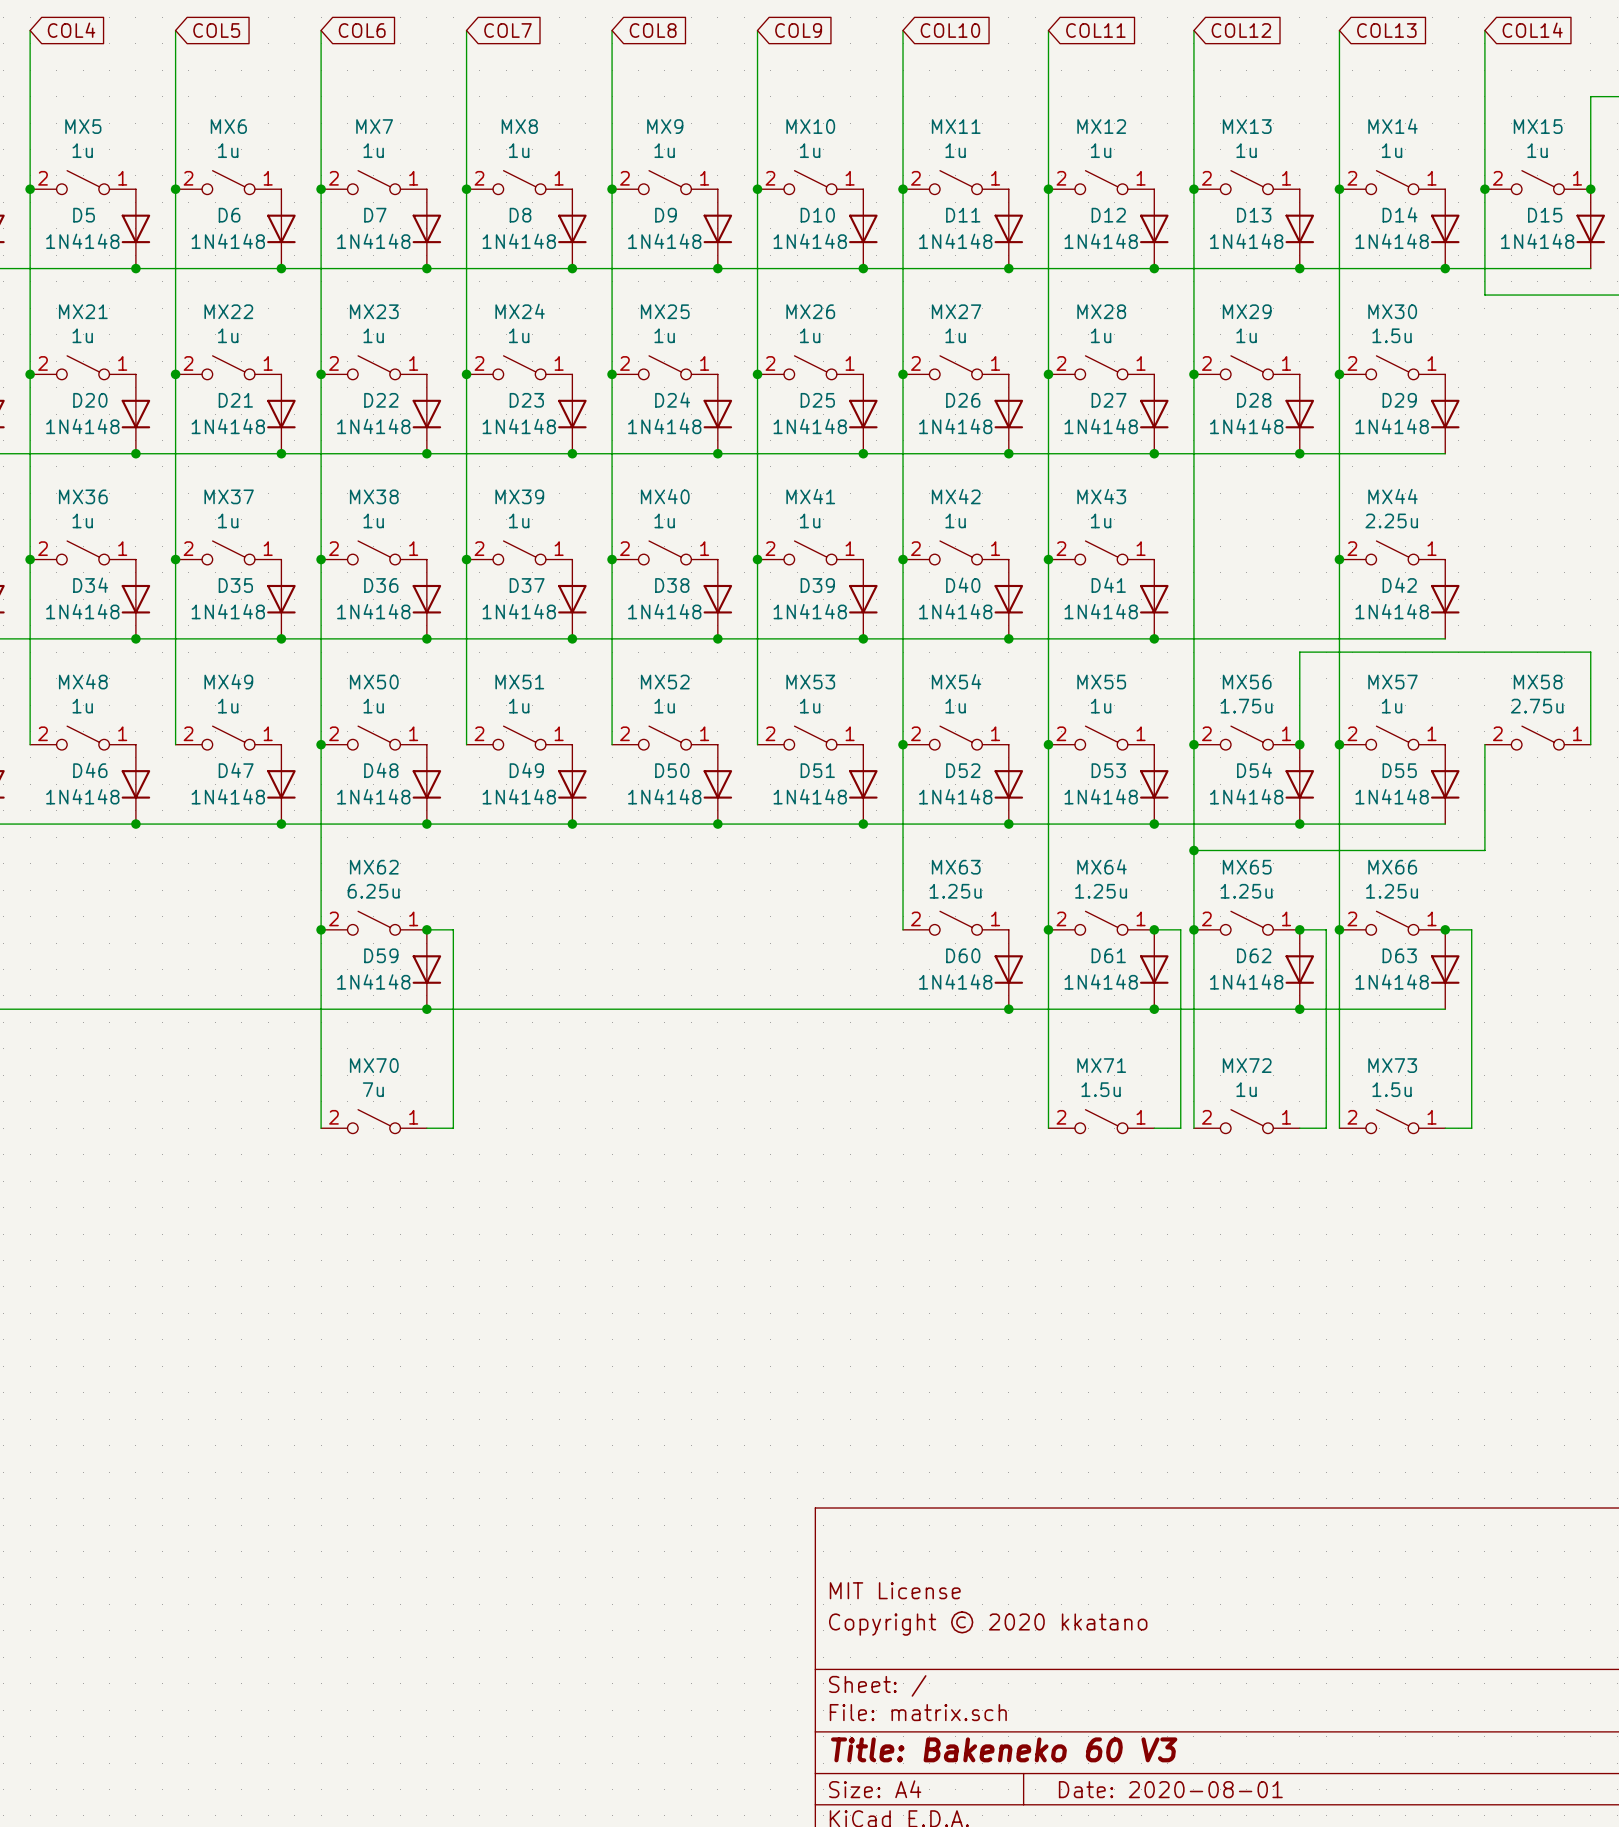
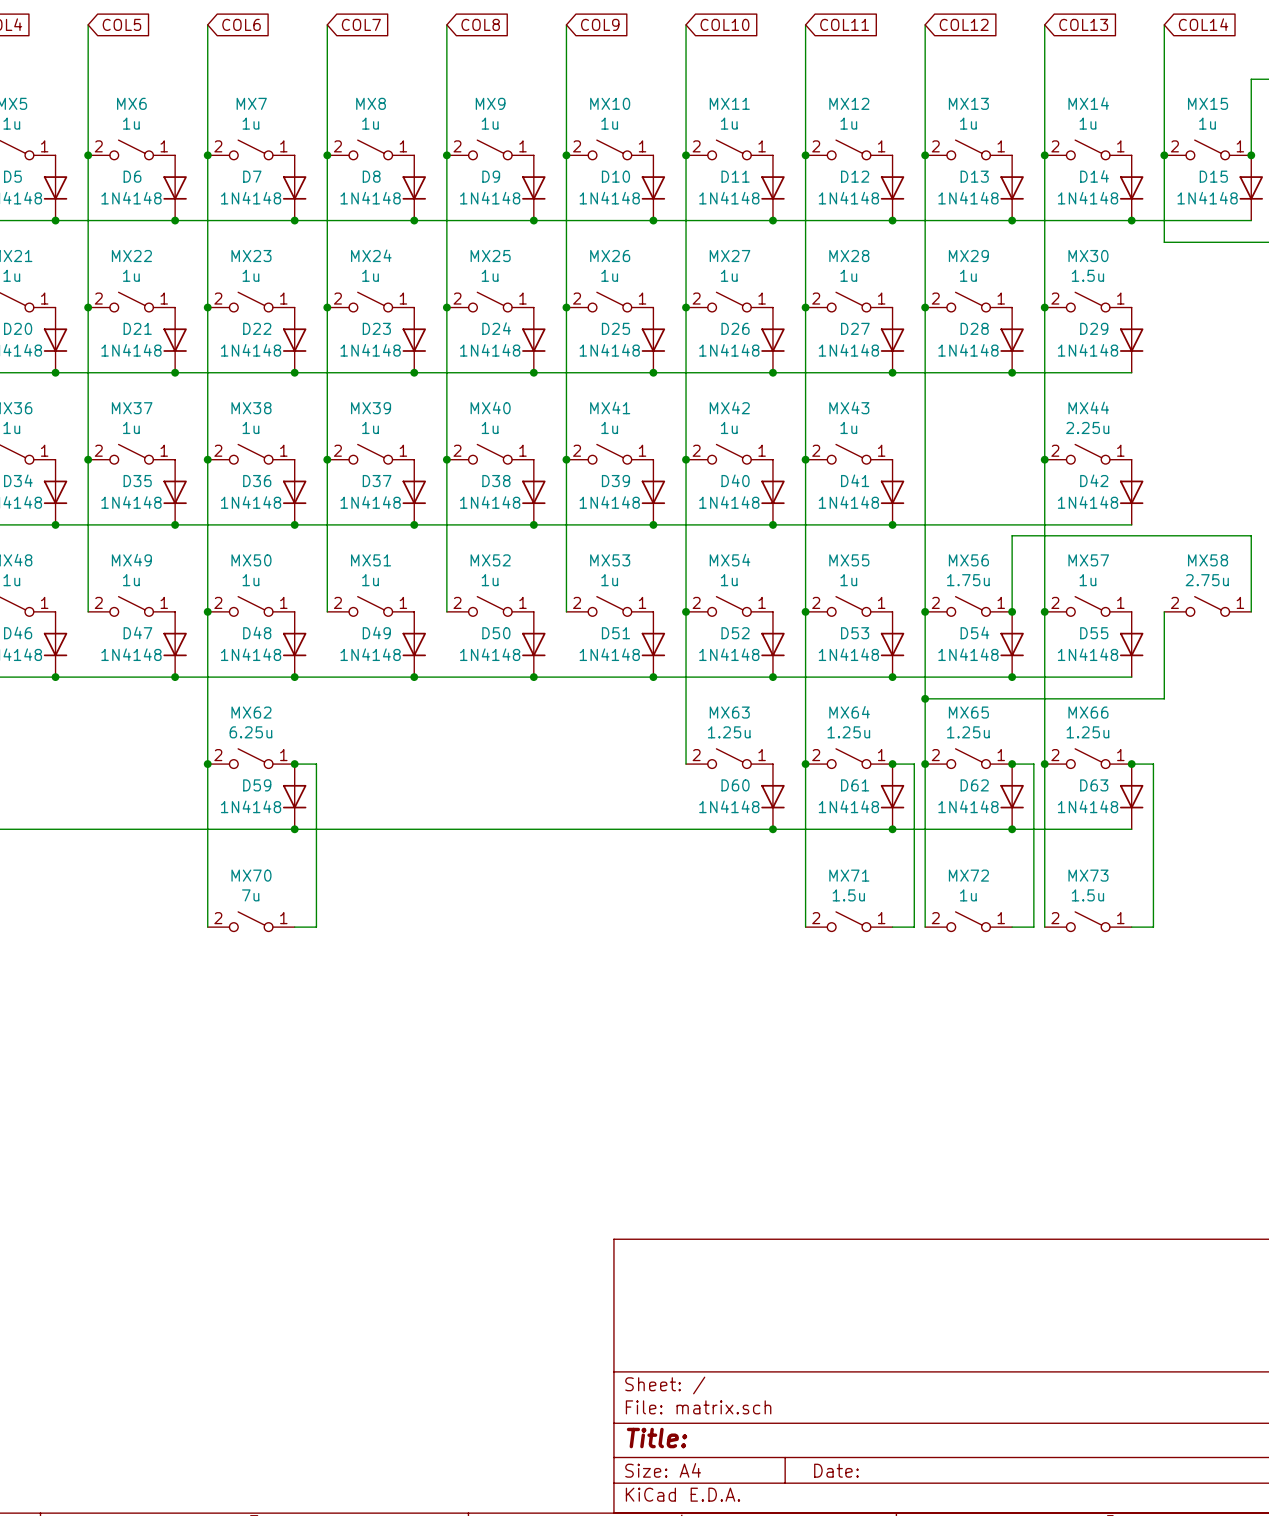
title block: MIT License (895, 1590) -> none
title block: Copyright © 2020 kkatano (988, 1623) -> none
title block: Title: Bakeneko 60 V3 (1004, 1749) -> Title: (657, 1438)
title block: Date: 2020-08-01 (1170, 1789) -> Date: (836, 1470)

